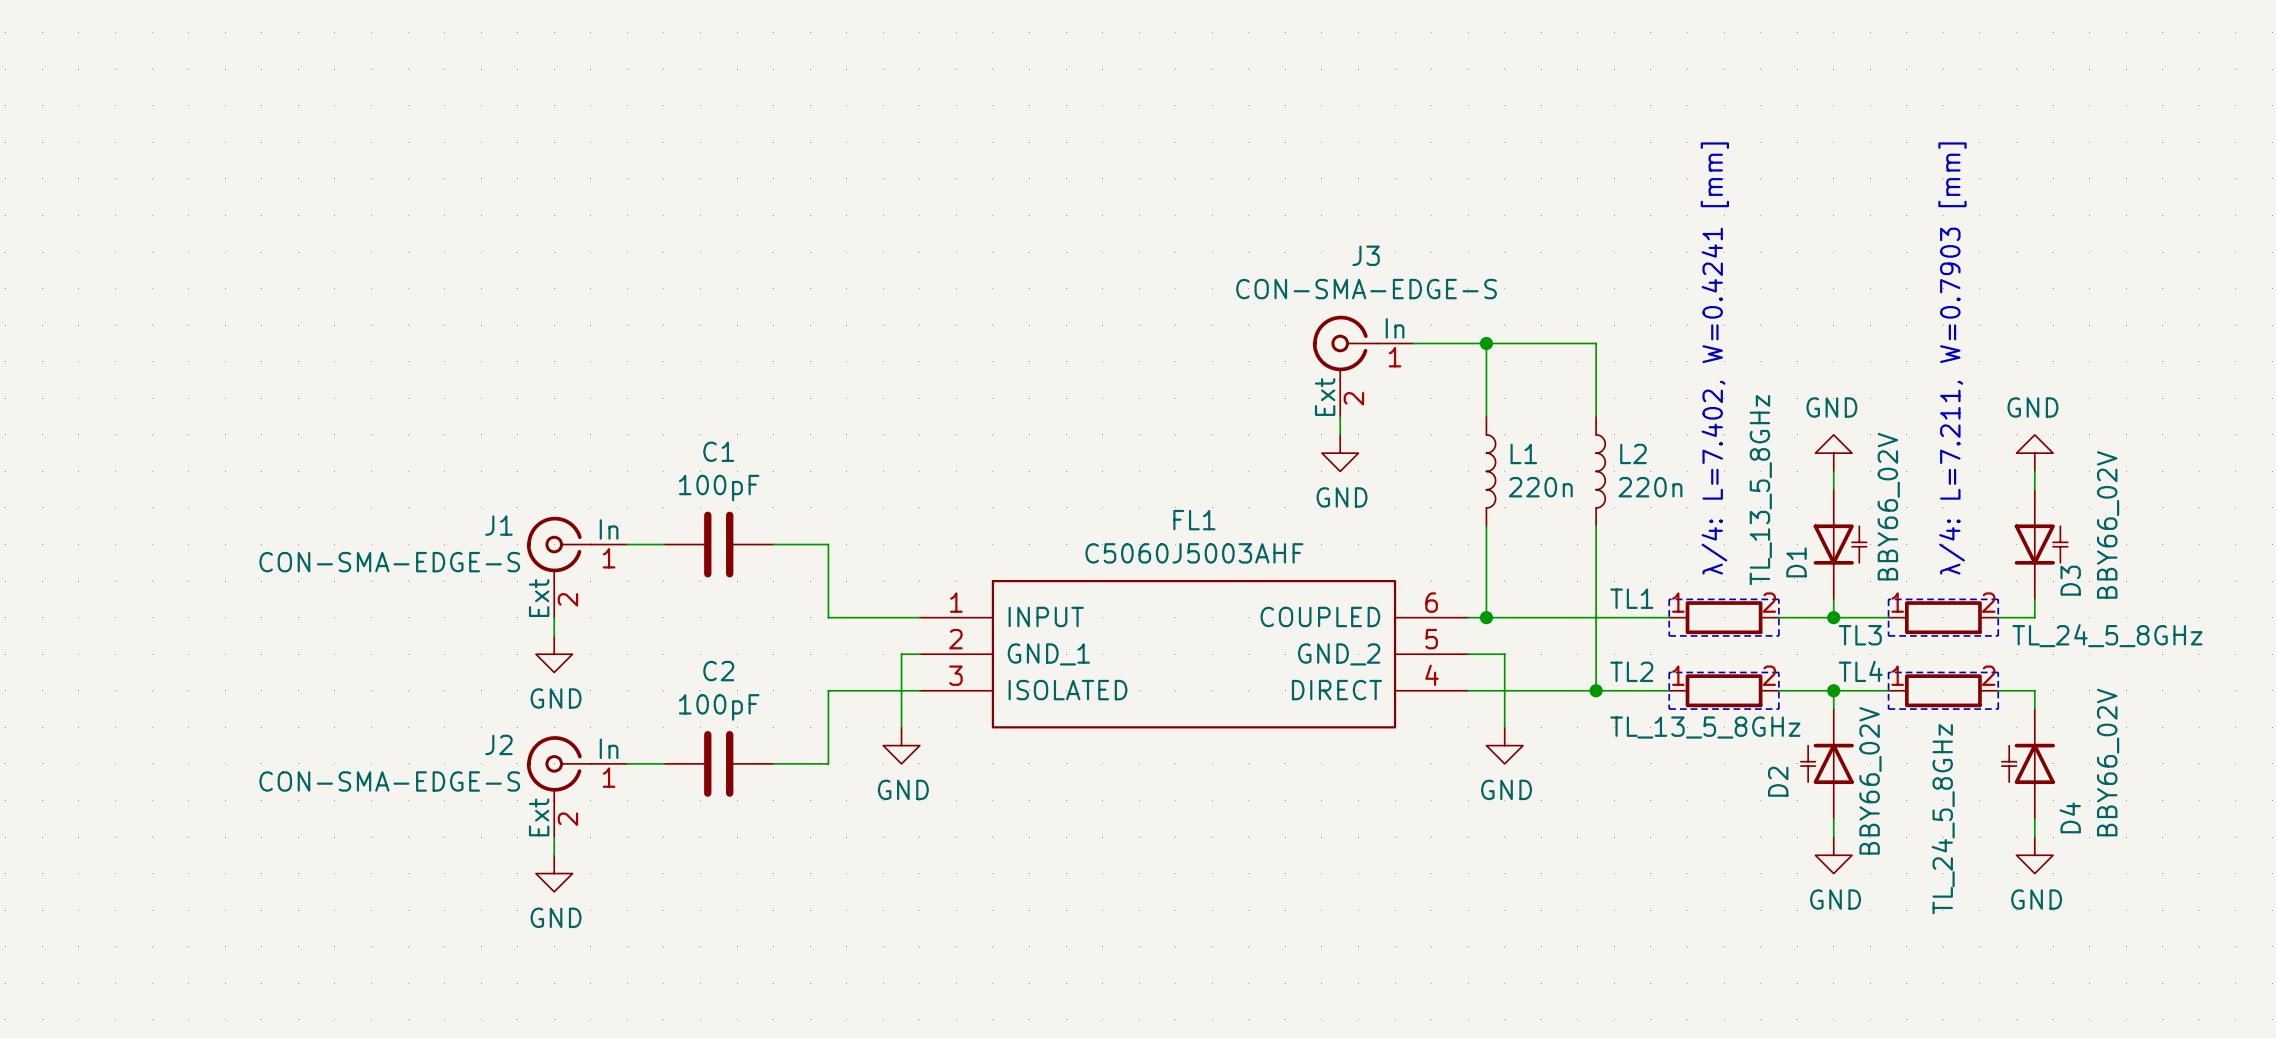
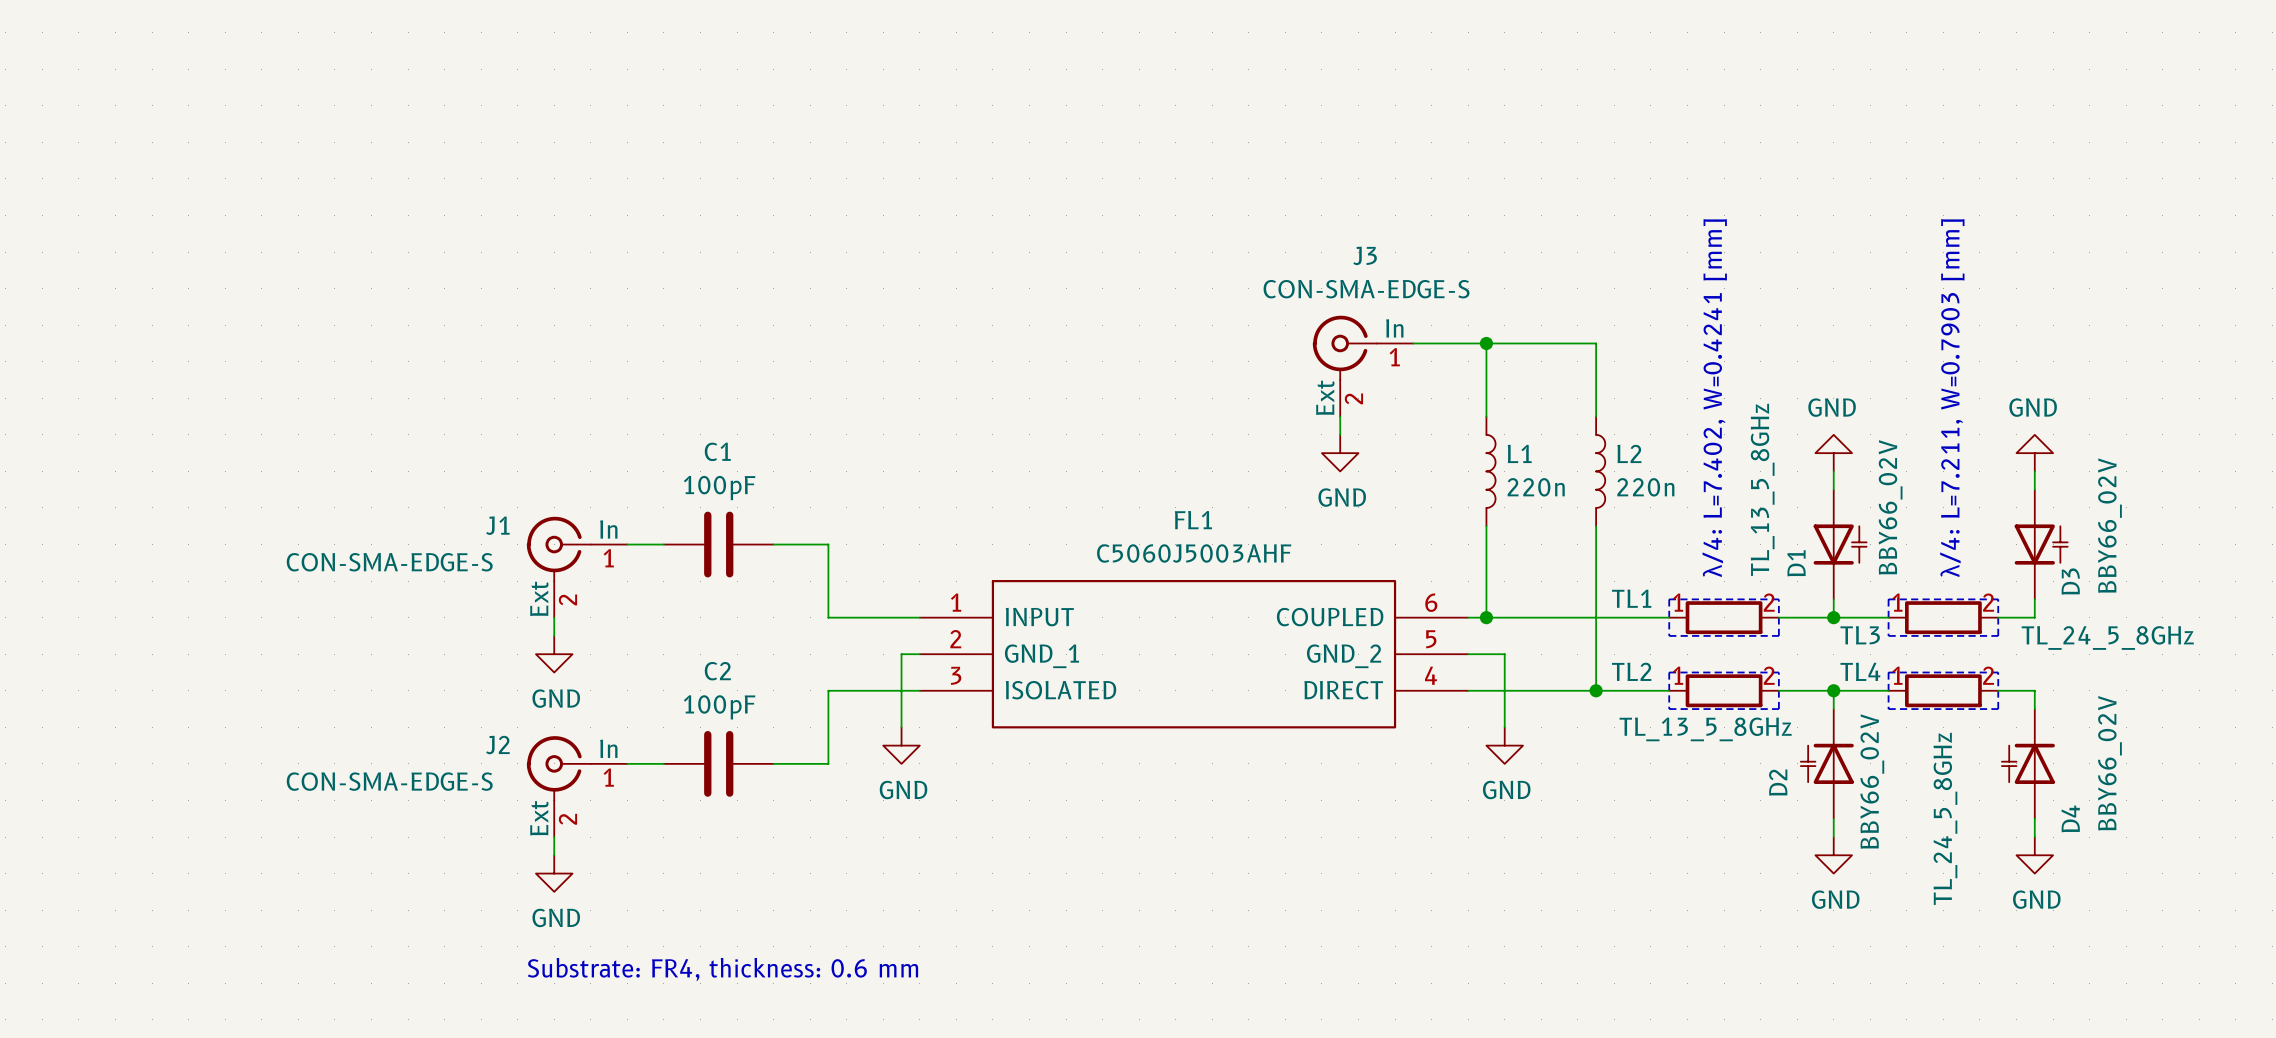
text: none -> Substrate: FR4, thickness: 0.6 mm (722, 969)

